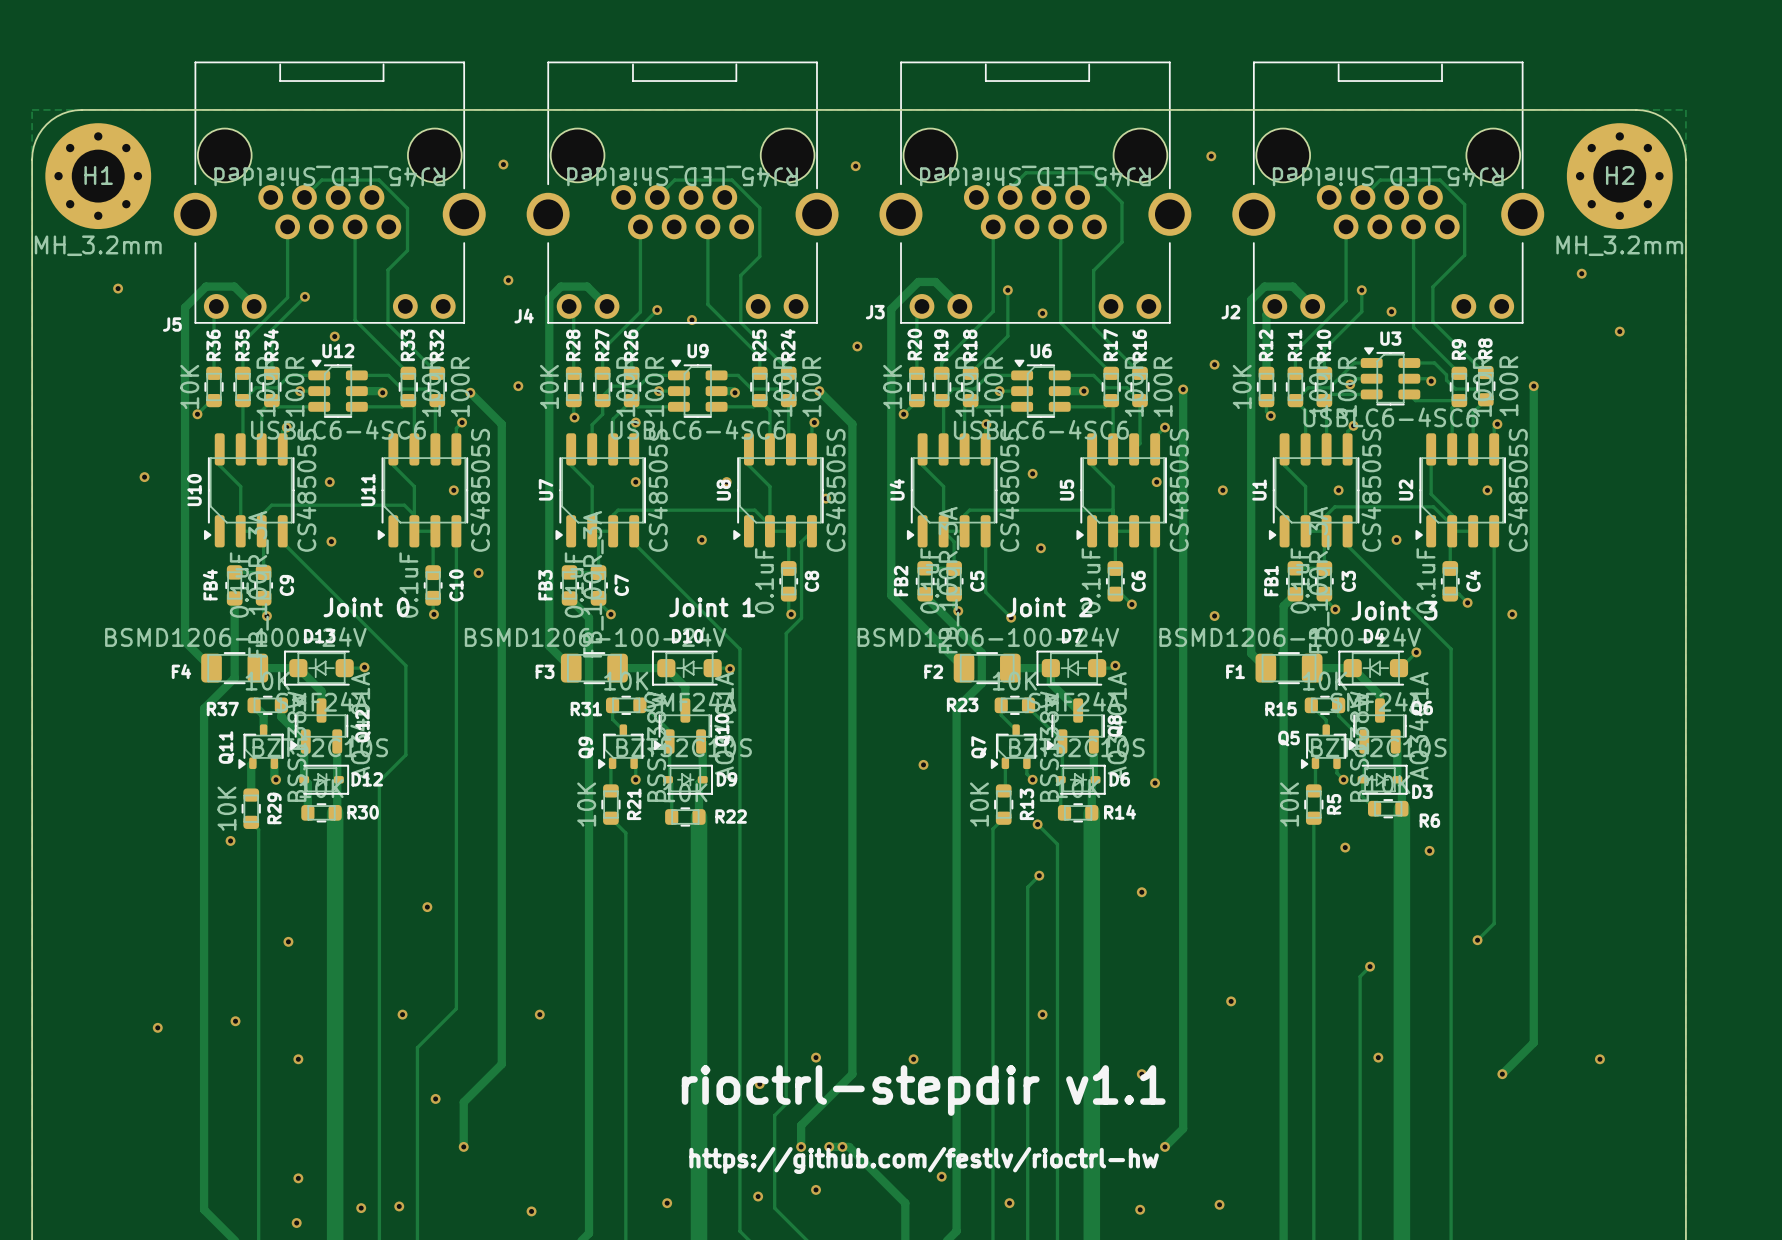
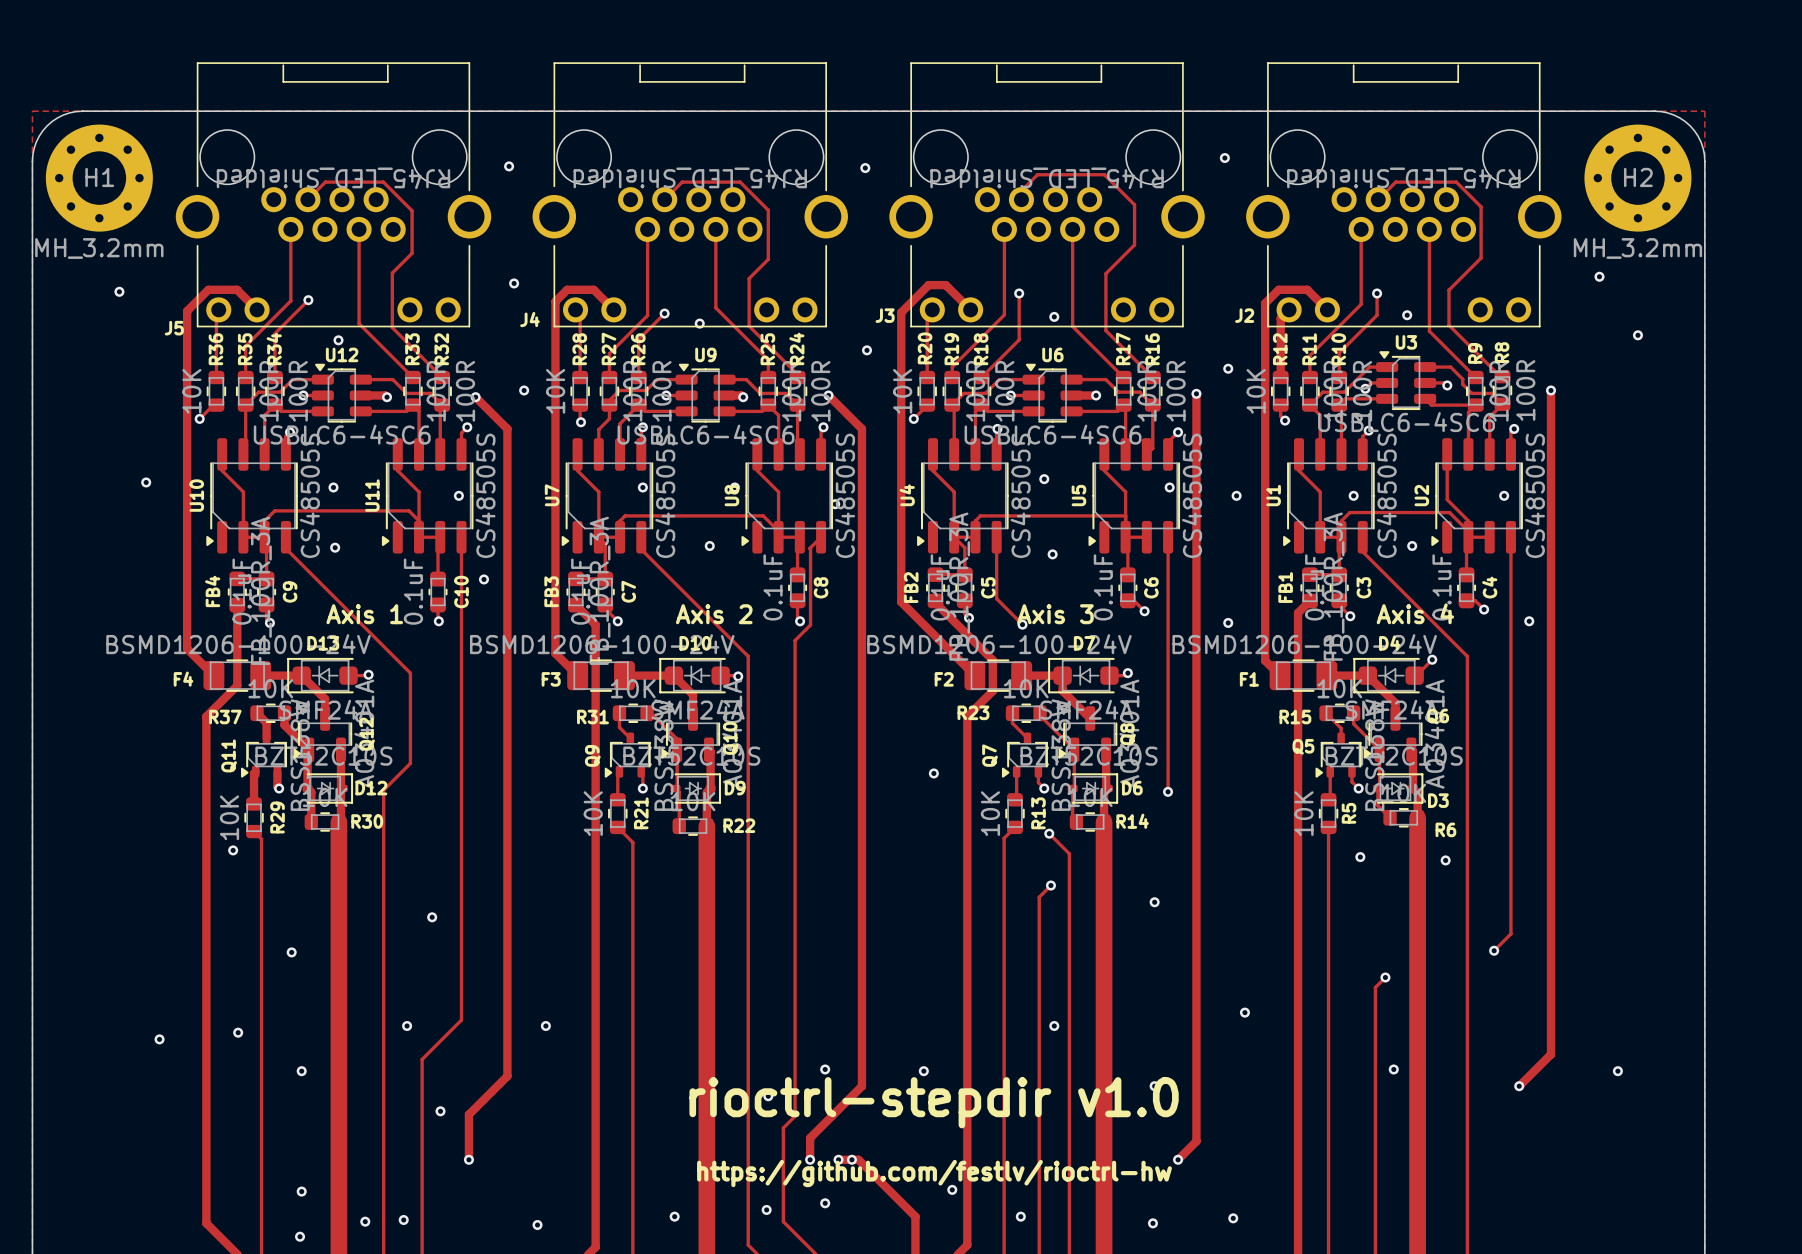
text: Joint 0 (366, 607) -> Axis 1 (364, 614)
text: Joint 1 (712, 607) -> Axis 2 (714, 614)
text: Joint 2 (1049, 607) -> Axis 3 (1055, 614)
text: Joint 3 (1394, 610) -> Axis 4 (1415, 613)
text: rioctrl-stepdir v1.1 (923, 1090) -> rioctrl-stepdir v1.0 (934, 1102)

